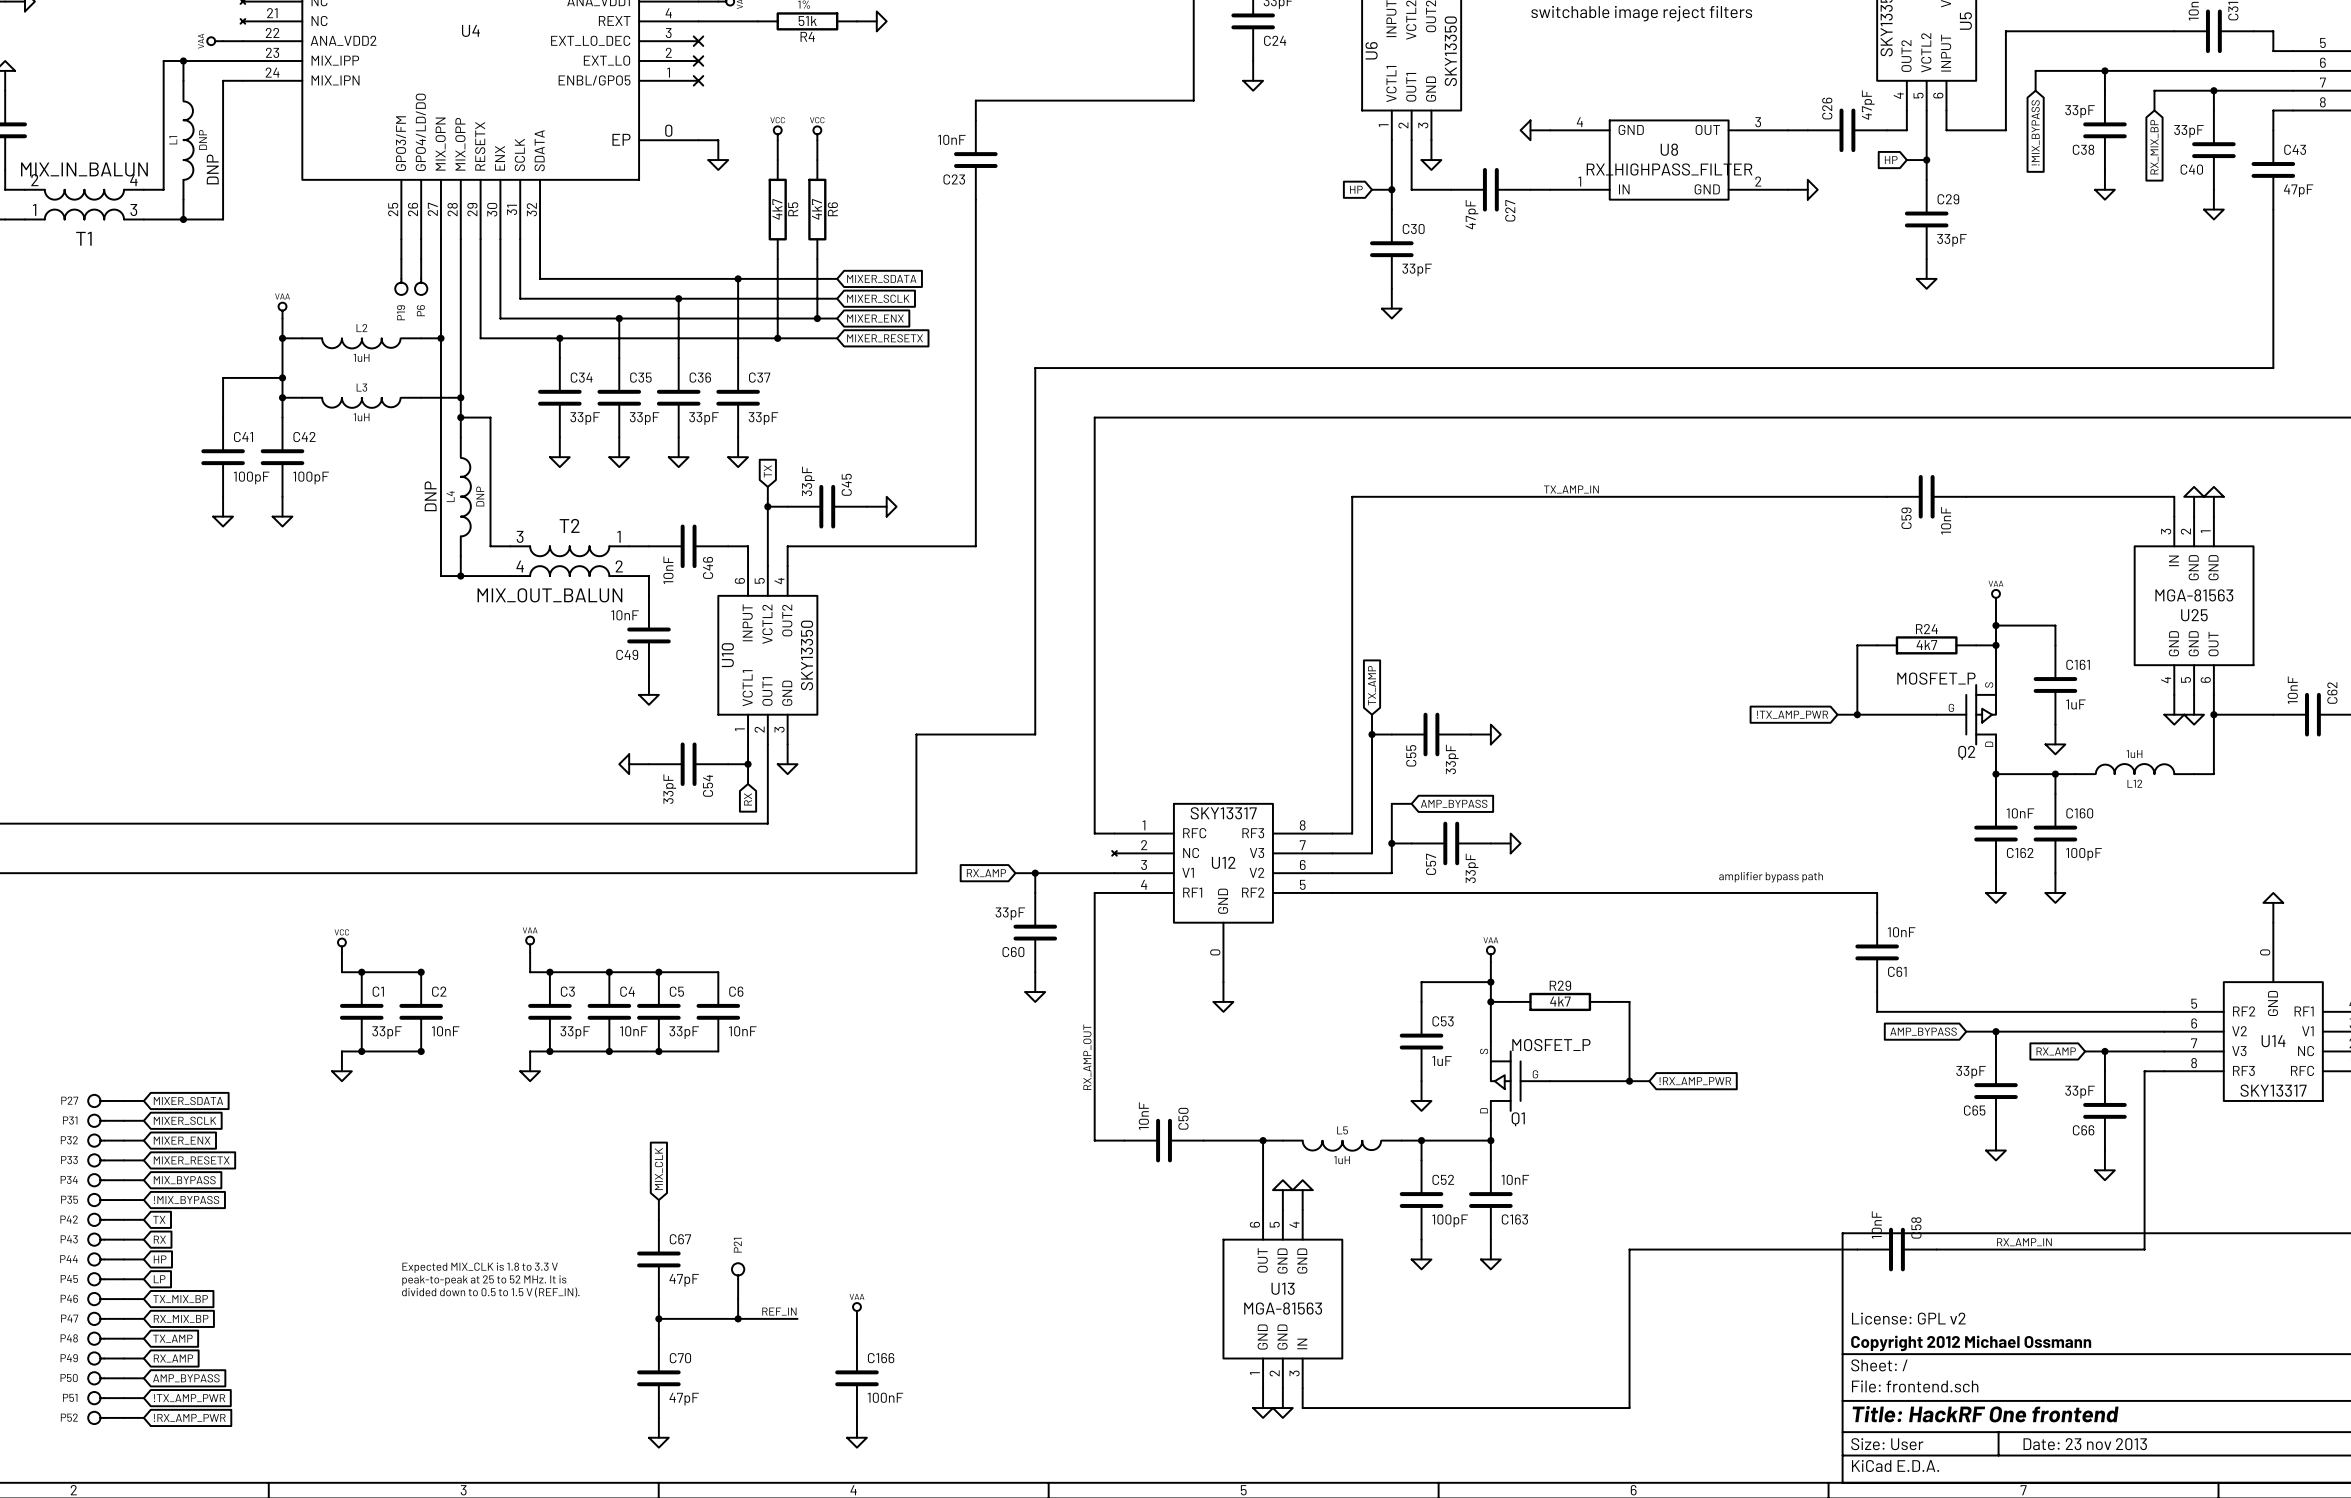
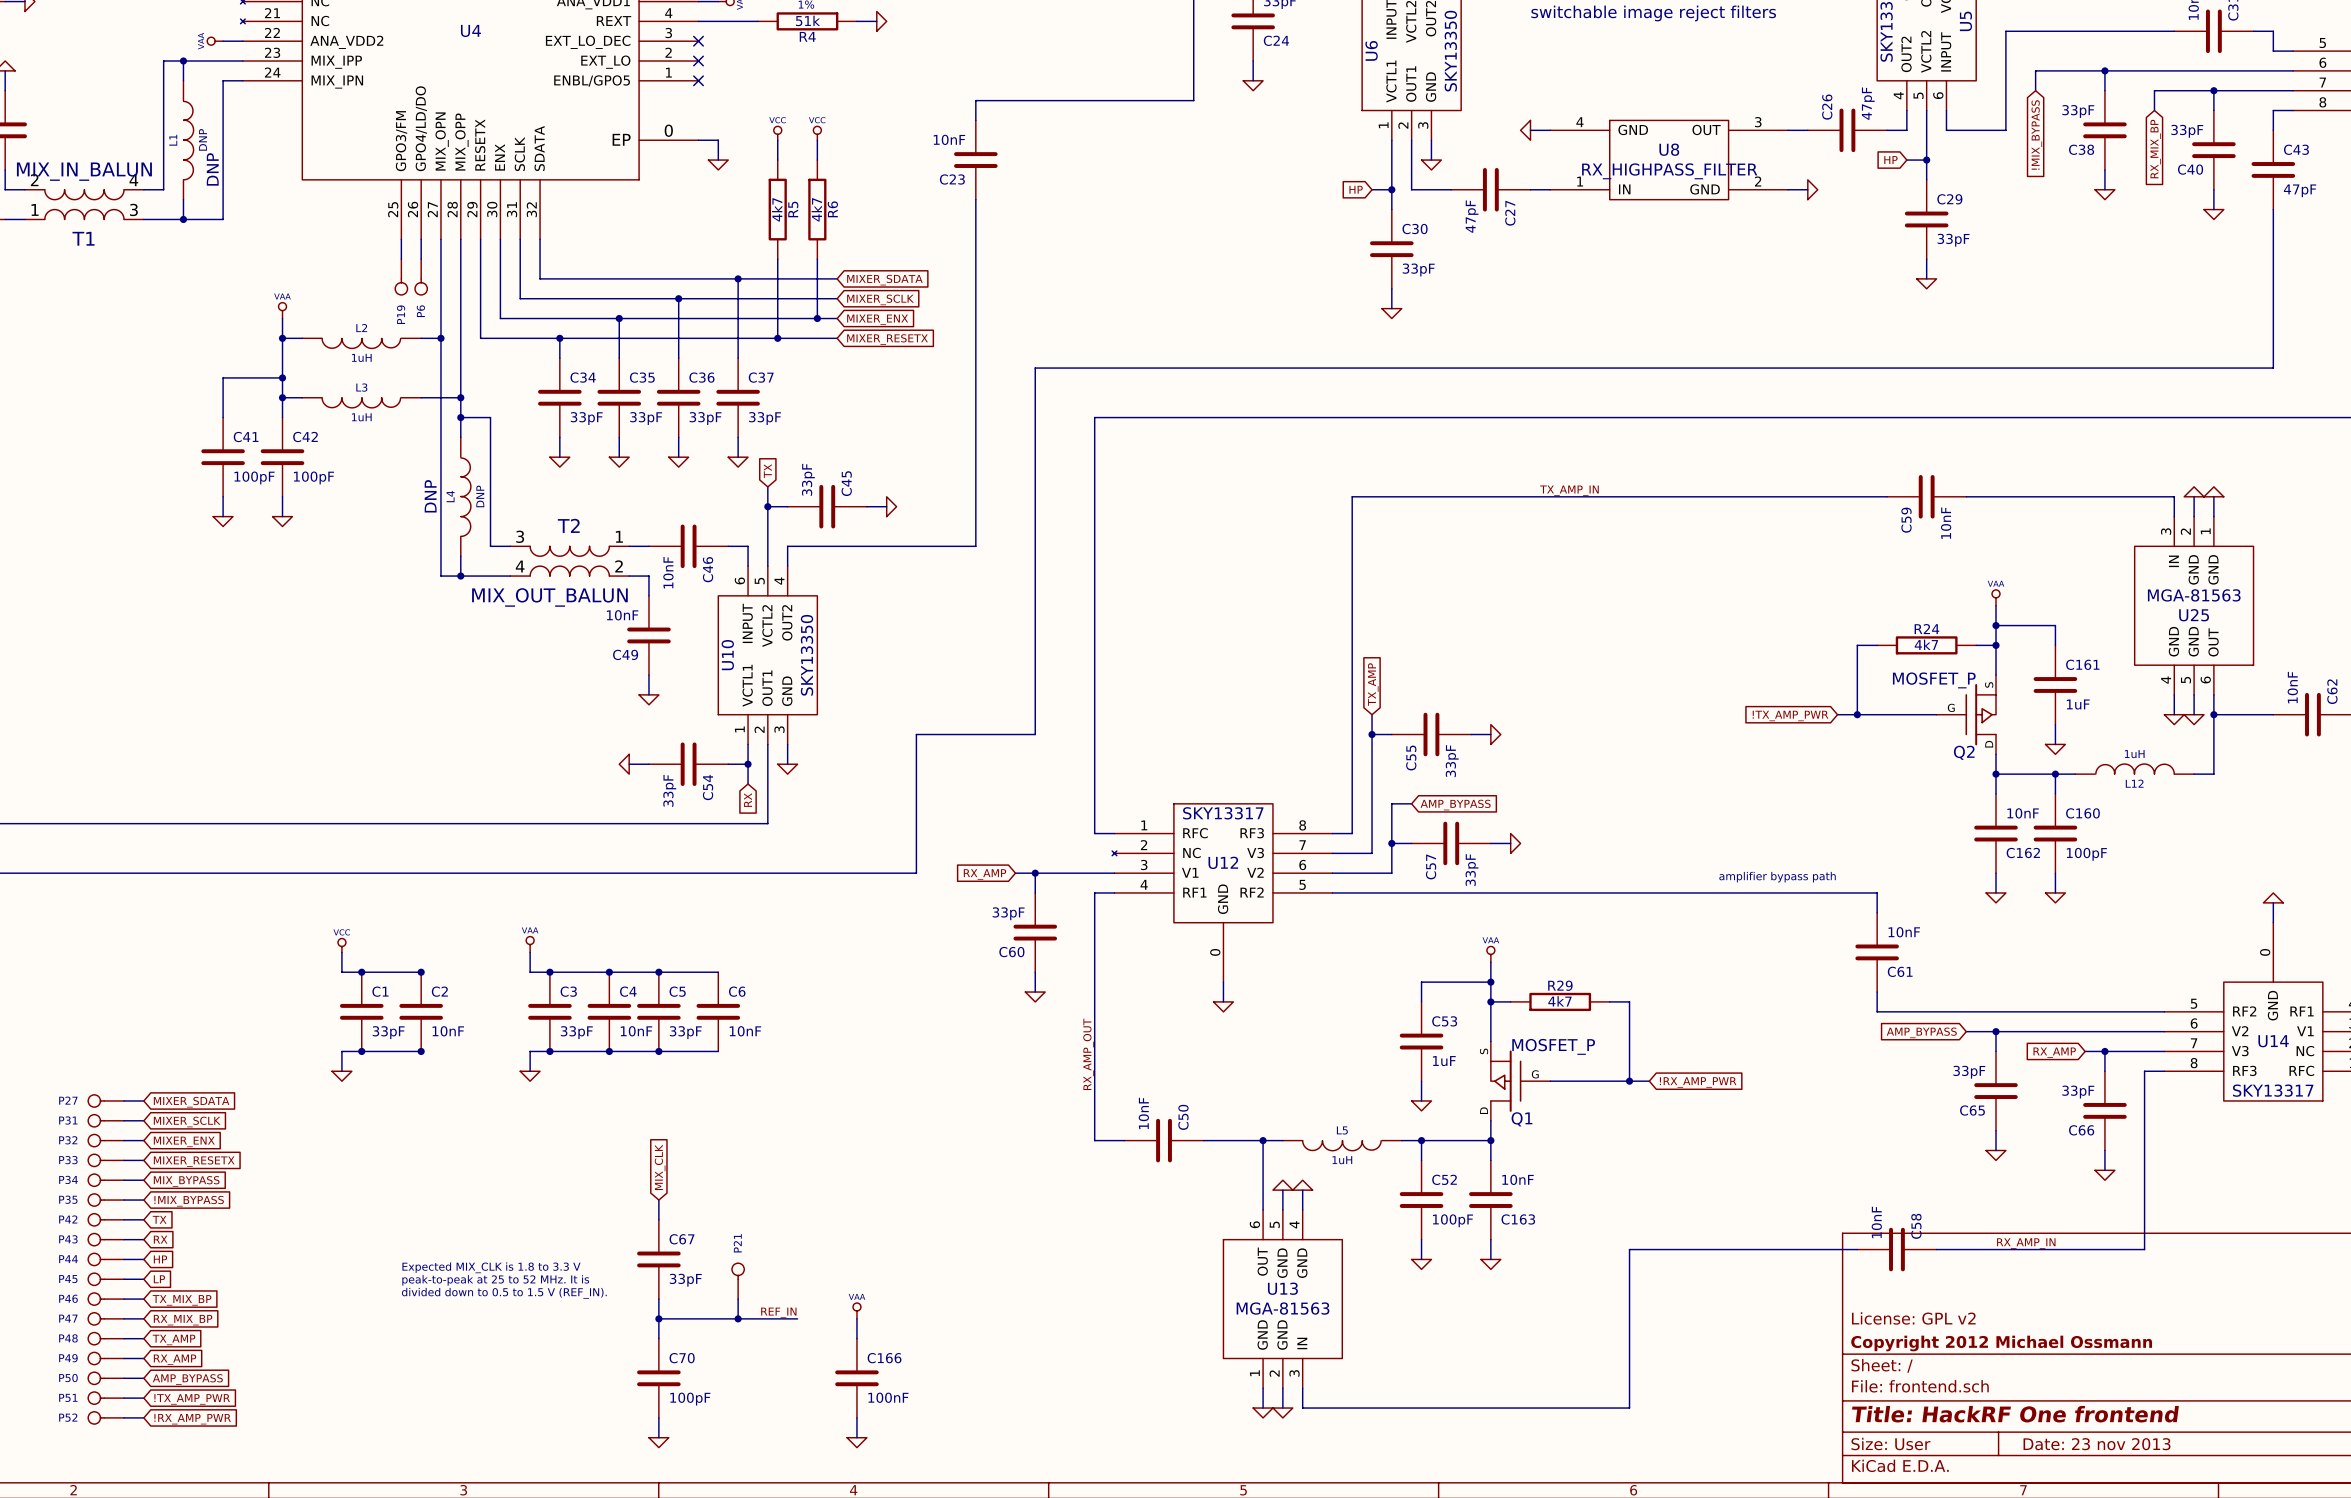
C67 value: 47pF (684, 1280) -> 33pF (685, 1280)
C70 value: 47pF (684, 1399) -> 100pF (690, 1399)

